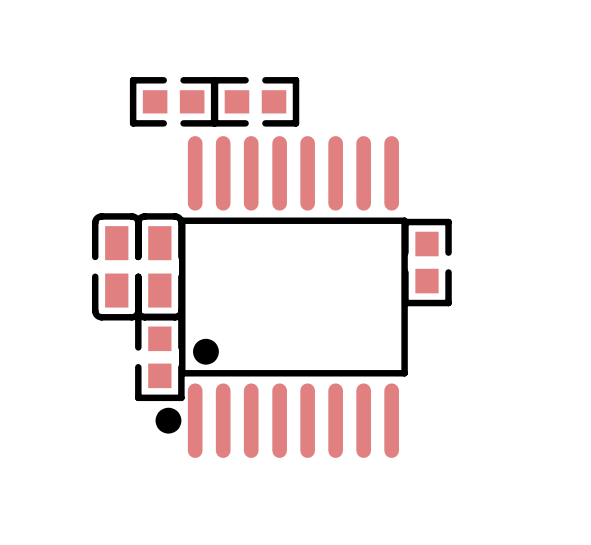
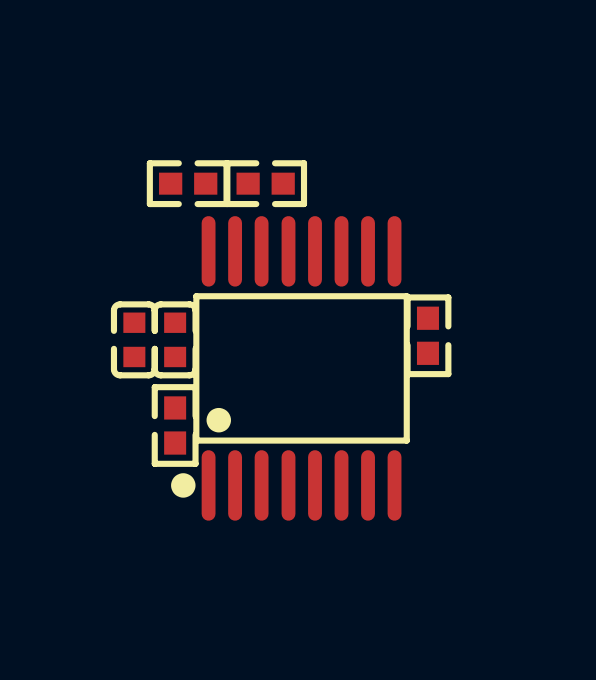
part footprint: [91, 213, 142, 321] -> [110, 301, 158, 379]
part footprint: [135, 213, 185, 321] -> [151, 301, 199, 379]

